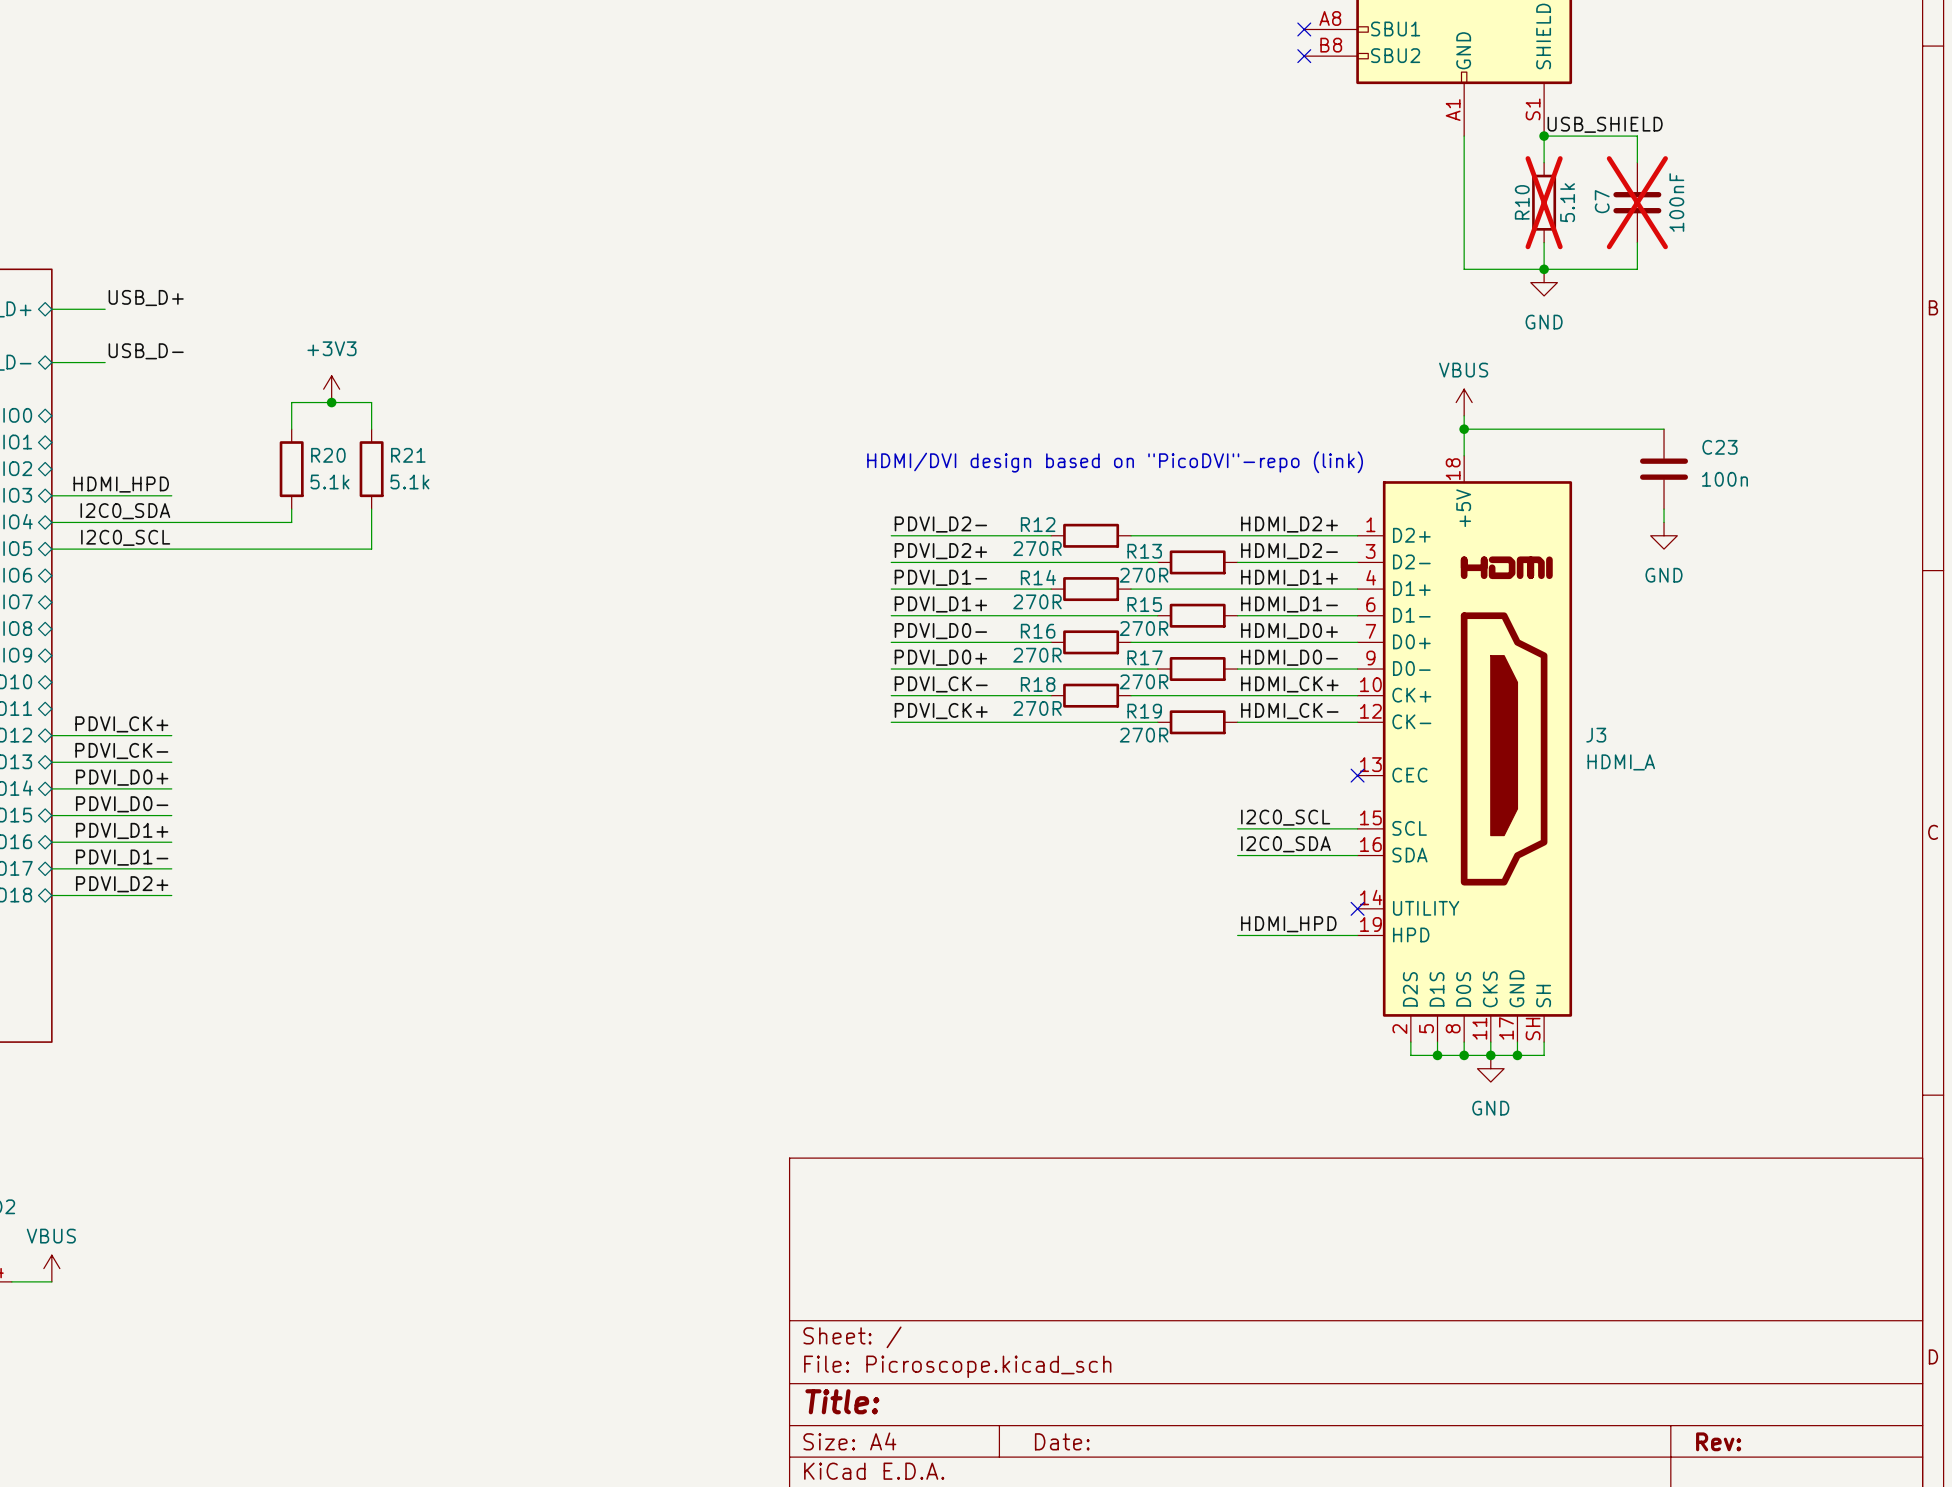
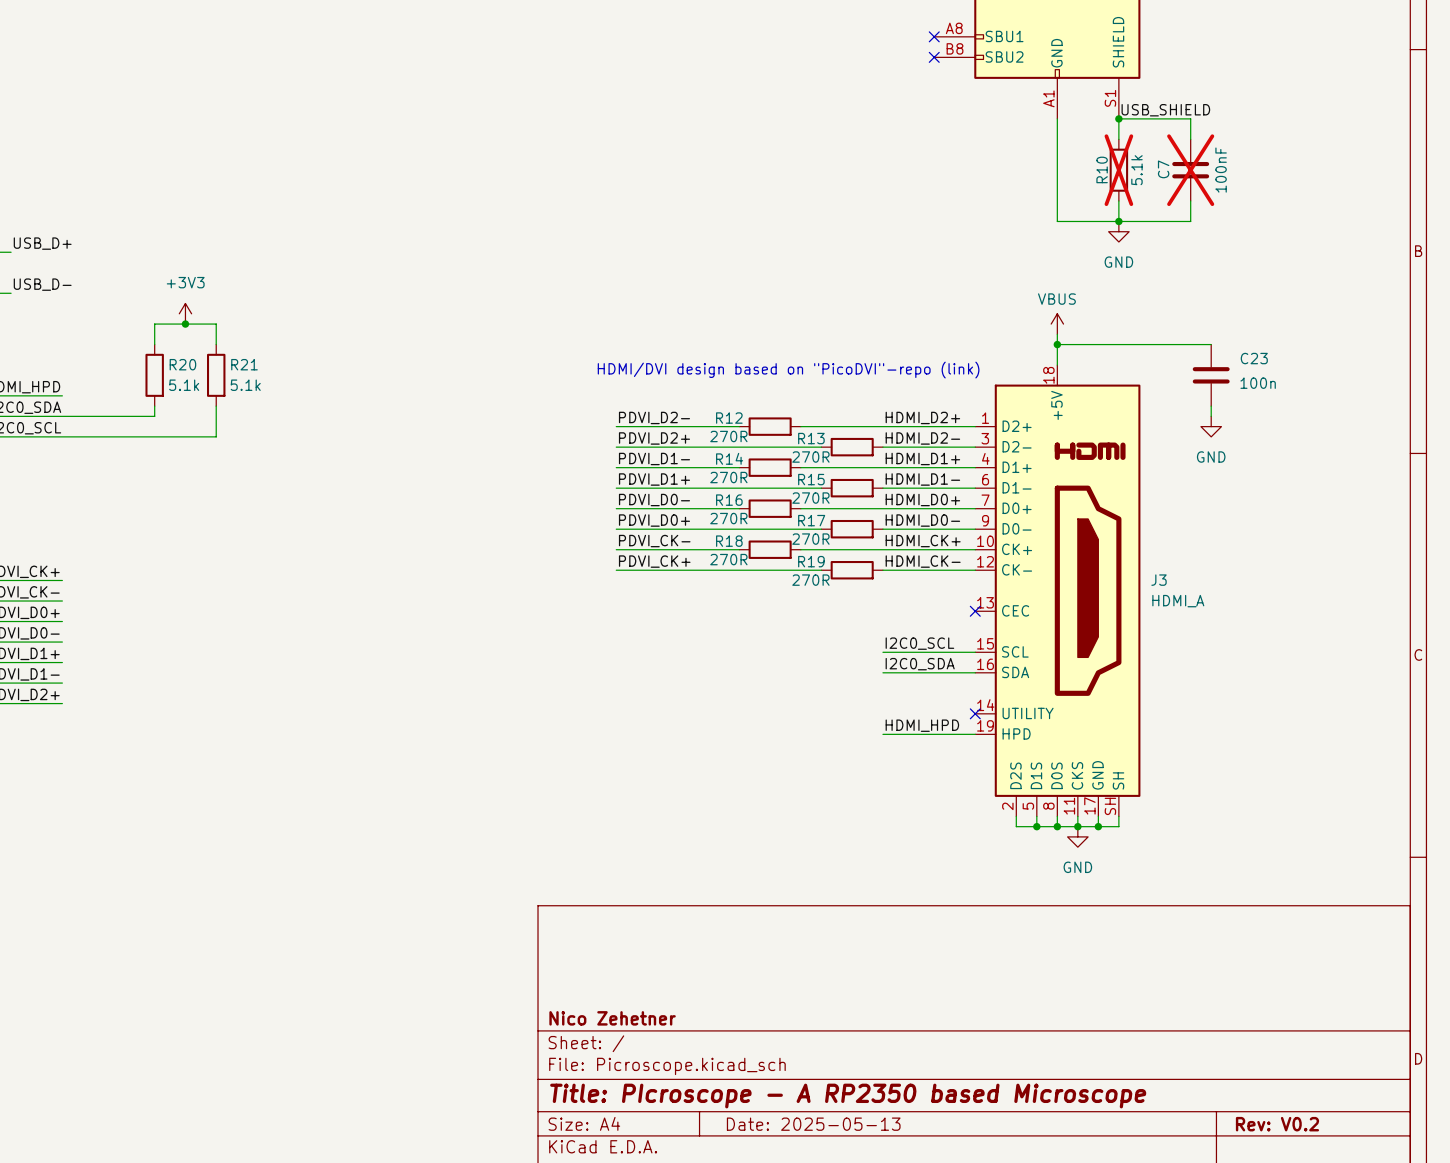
title block: none -> Nico Zehetner (612, 1018)
title block: Title: (842, 1401) -> Title: PIcroscope - A RP2350 based Microscope (848, 1096)
title block: Date: (1062, 1441) -> Date: 2025-05-13 (813, 1124)
title block: Rev: (1718, 1441) -> Rev: V0.2 (1277, 1124)

